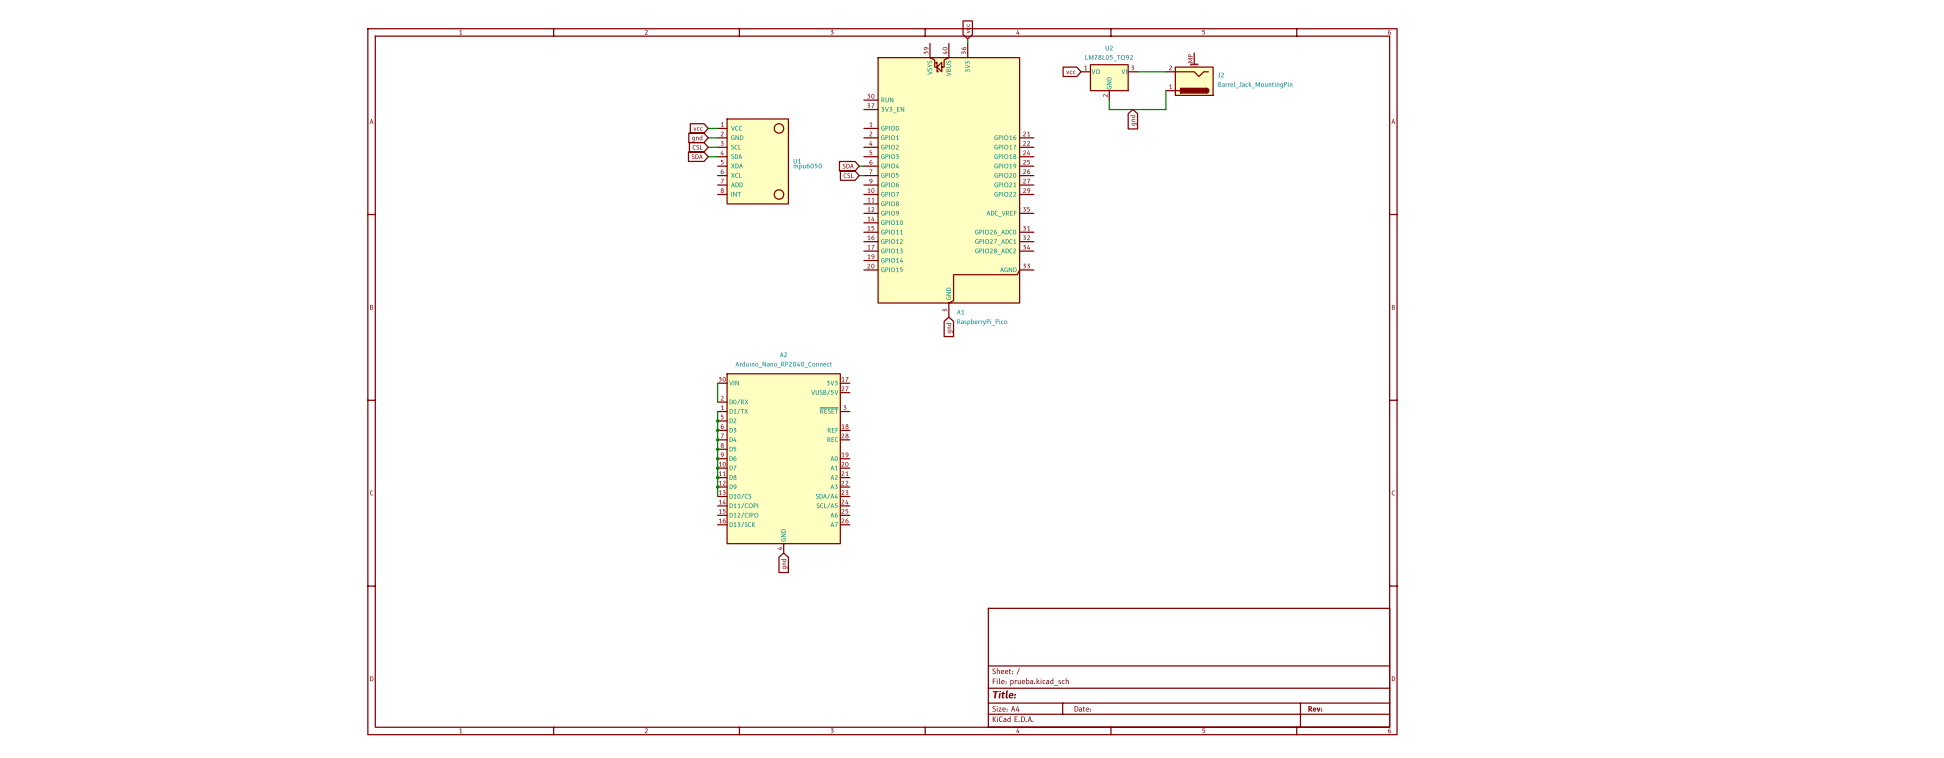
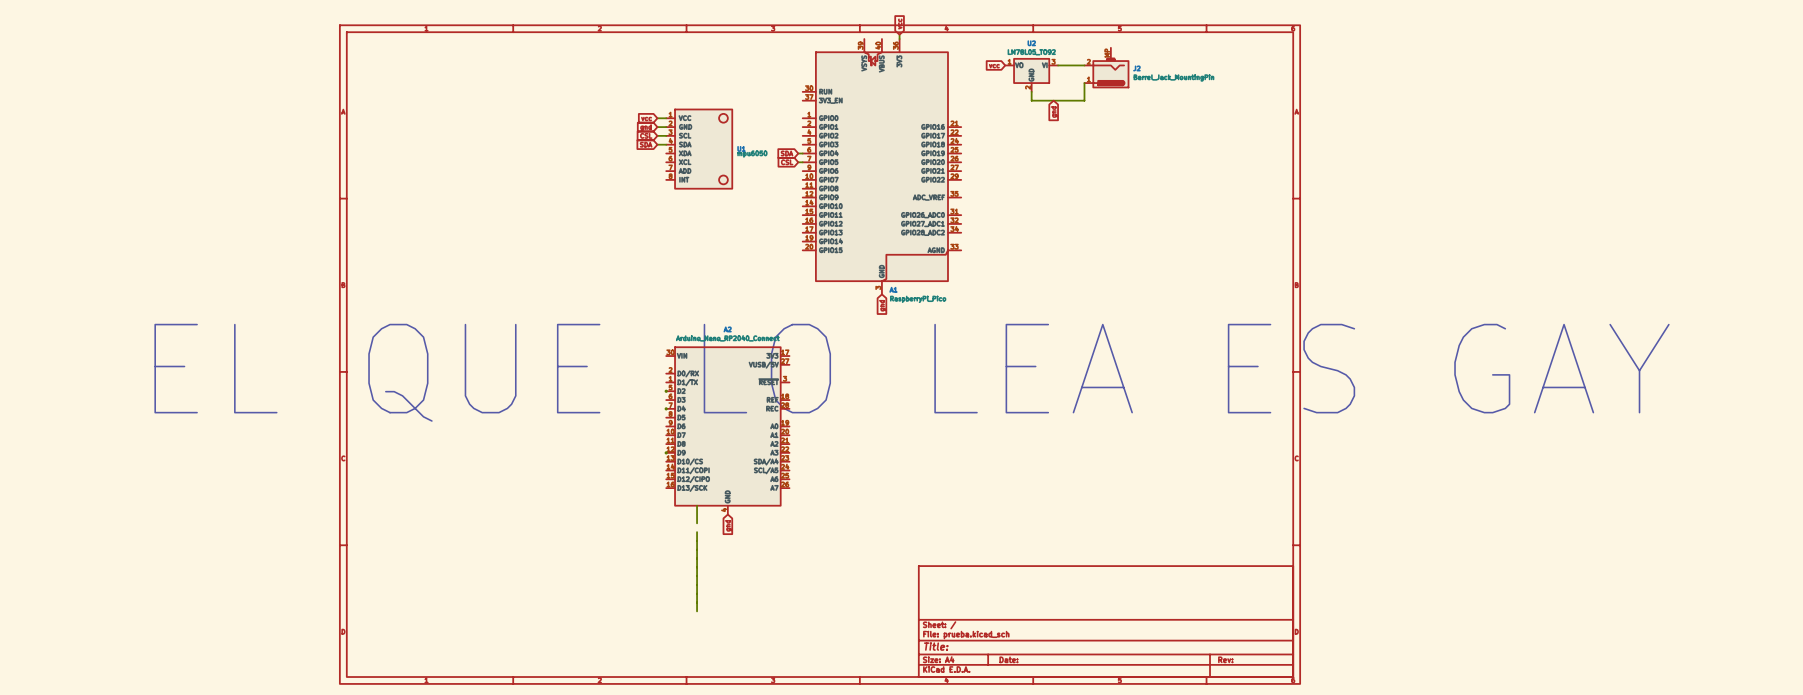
wire: (717, 383) (717, 402) -> none
text: none -> EL QUE LO LEA ES GAY (912, 372)
wire: (717, 411) (717, 496) -> none
junction: (717, 430) -> none
junction: (717, 449) -> none
junction: (717, 458) -> none
junction: (717, 468) -> none
junction: (717, 477) -> none
wire: none -> (697, 505) (697, 523)
wire: none -> (697, 532) (697, 611)

